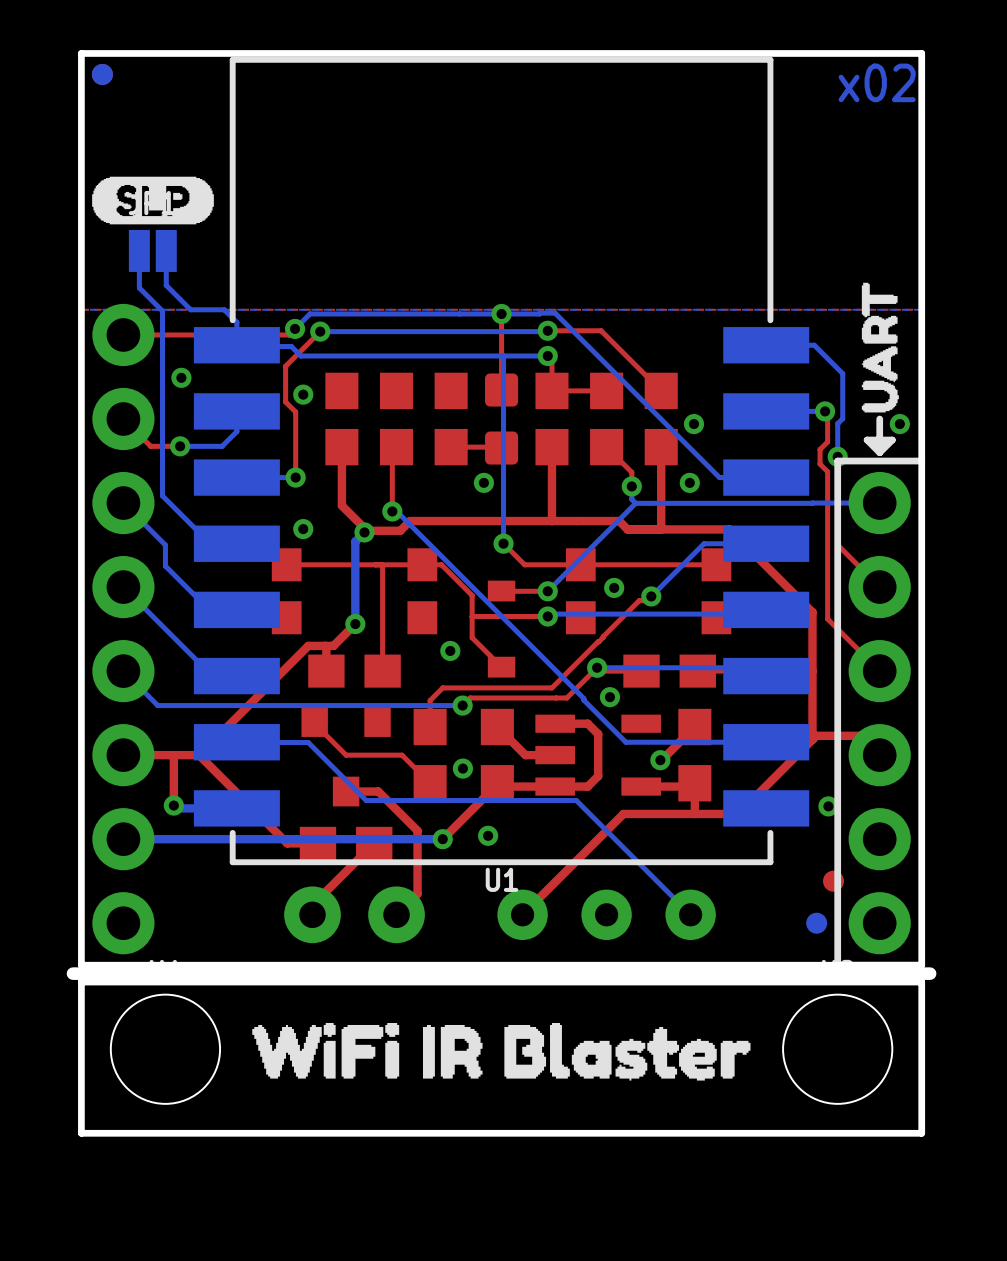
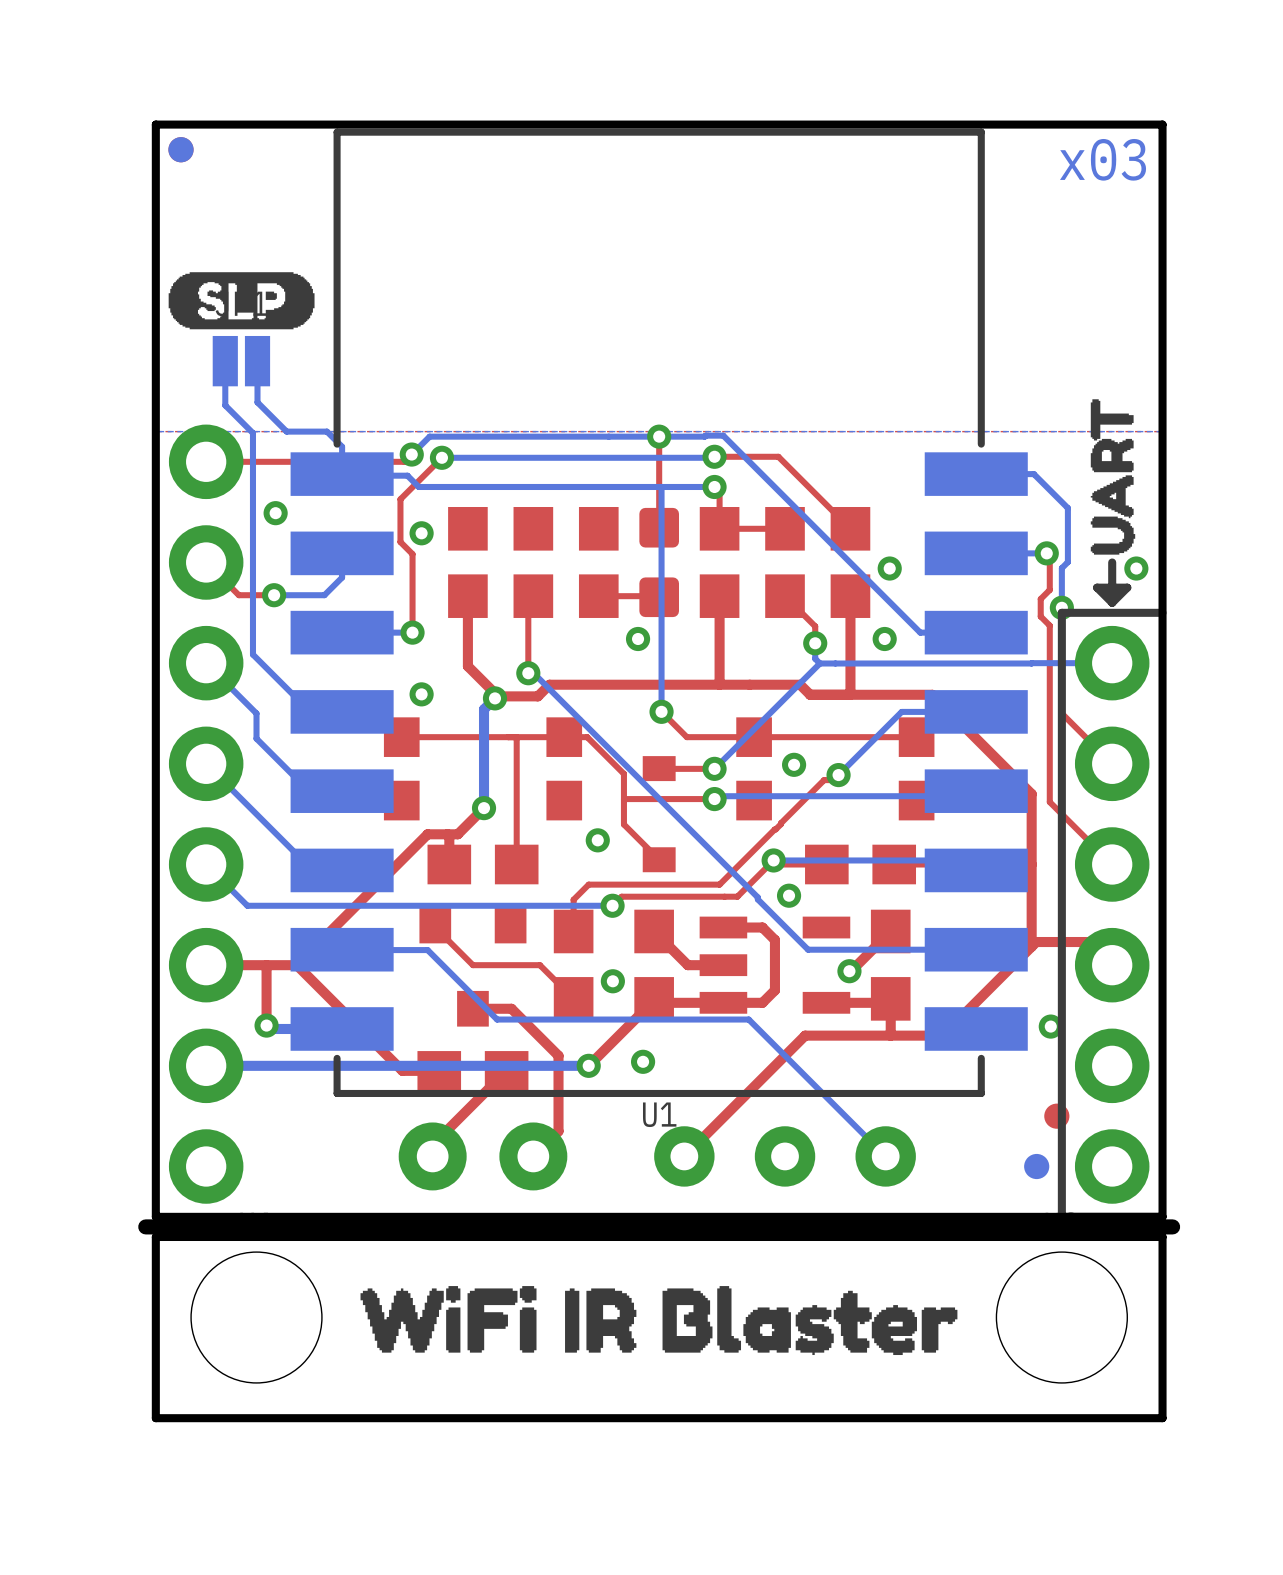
text: x02 (877, 82) -> x03 (1103, 159)

